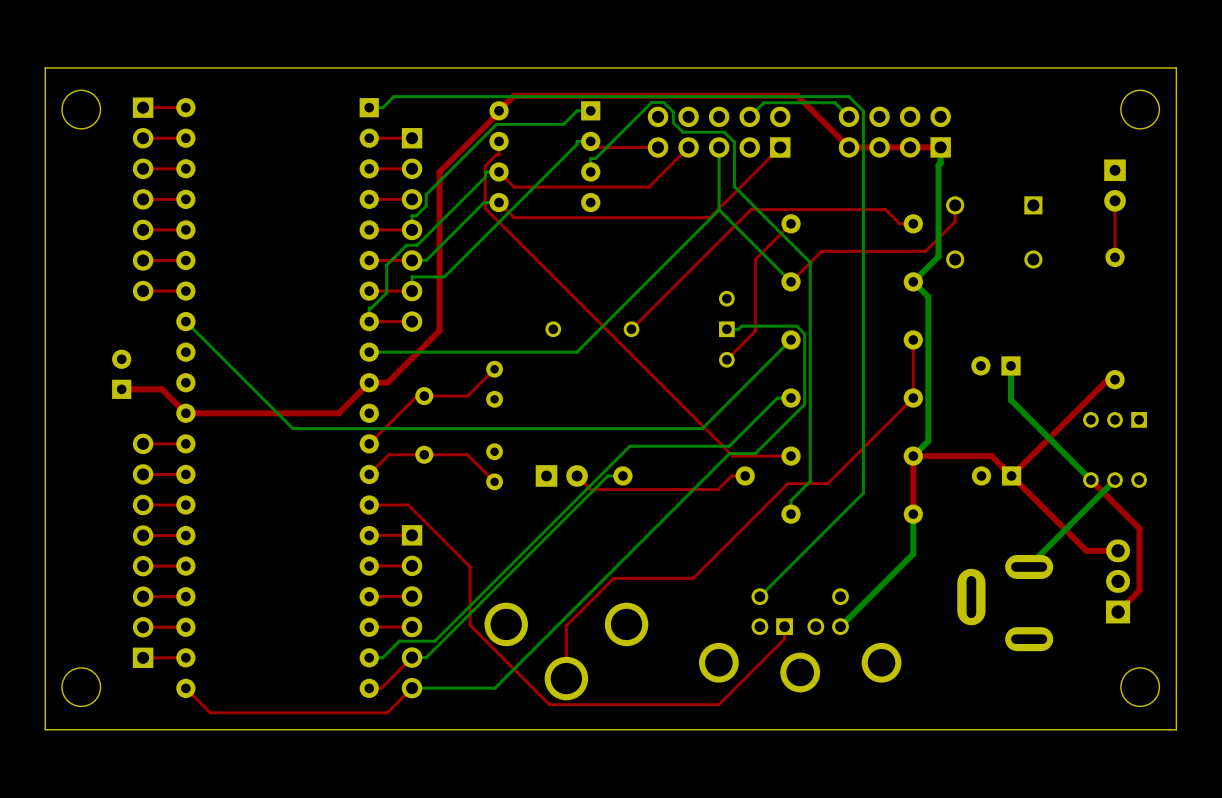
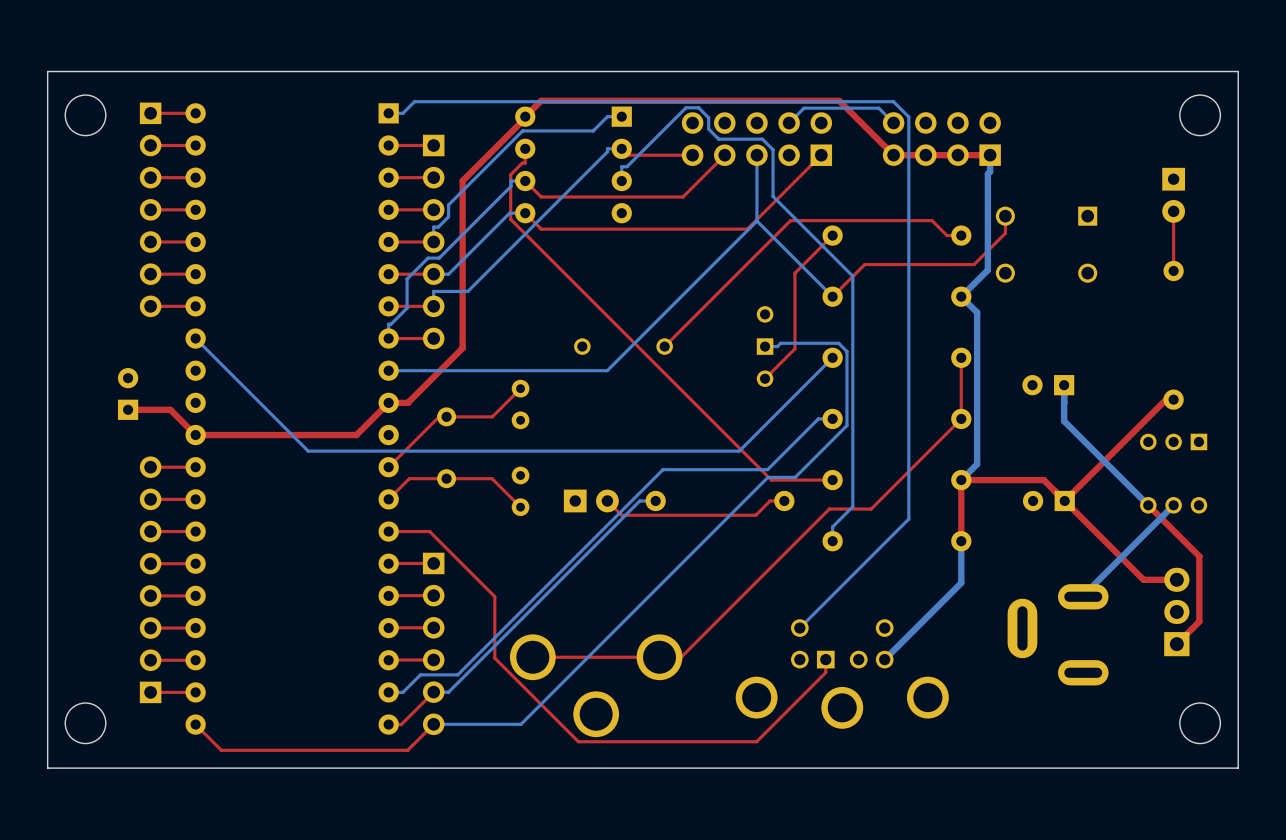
top track: (693, 578) (613, 578) (566, 625) (566, 678) -> (729, 608) (681, 657) (532, 657)

